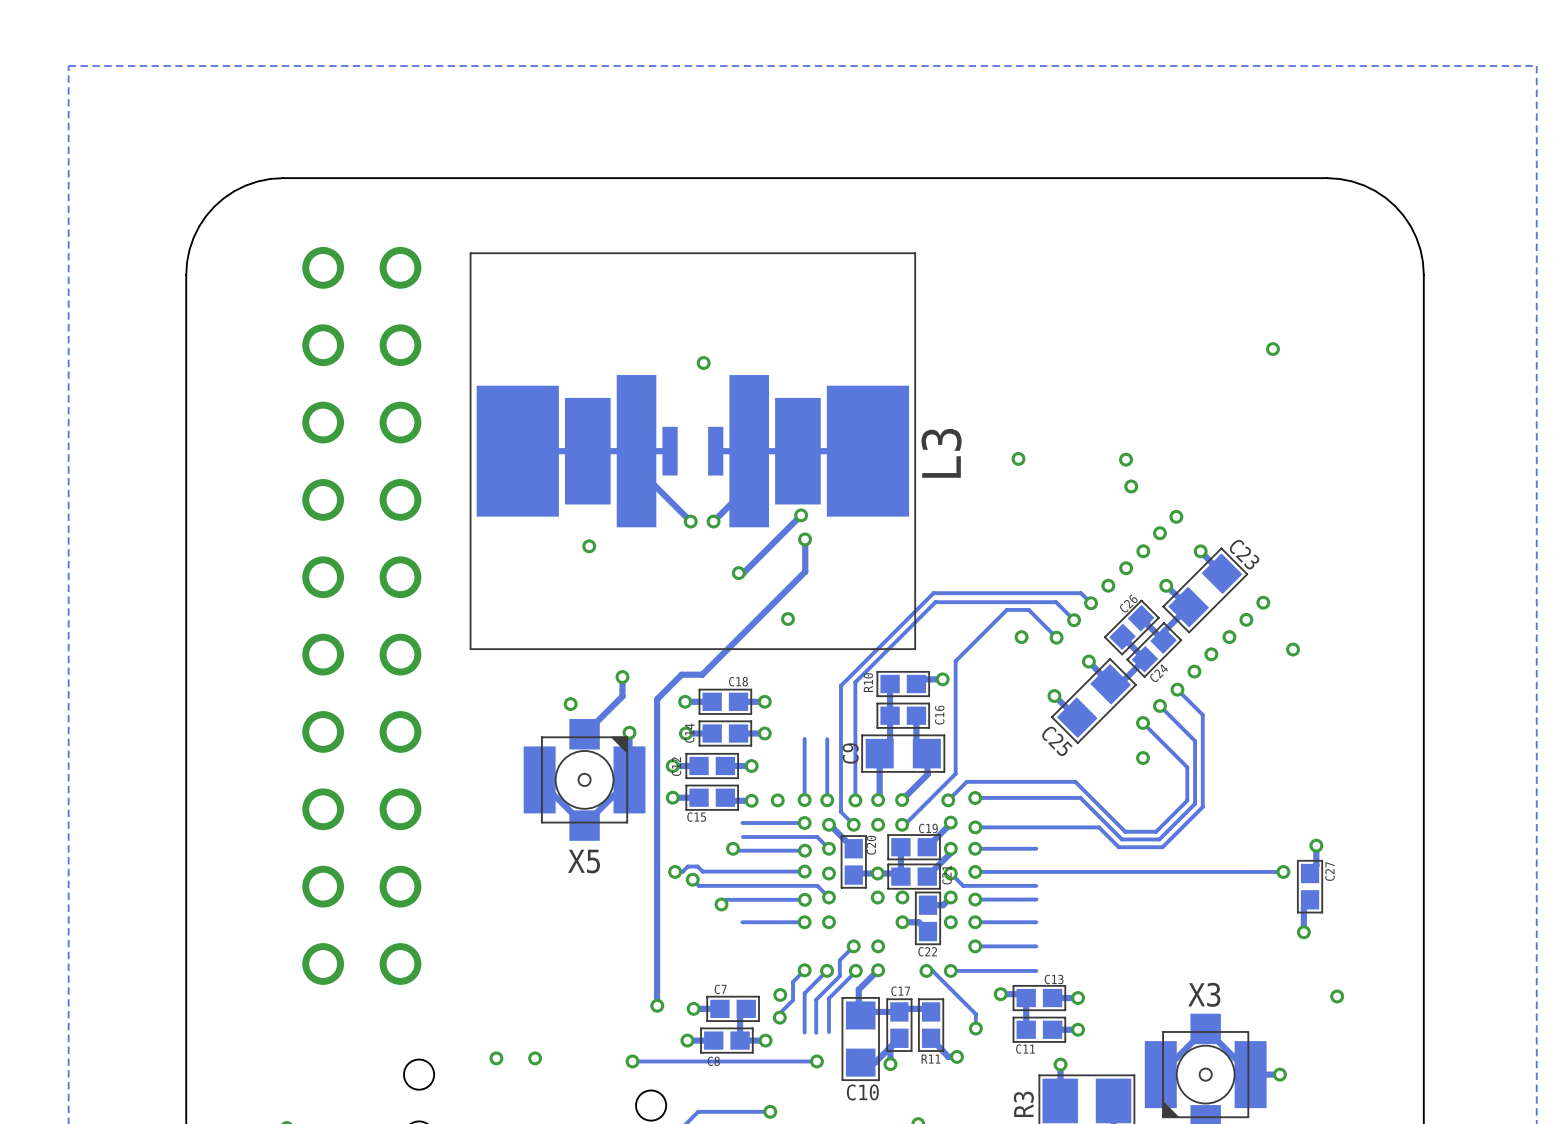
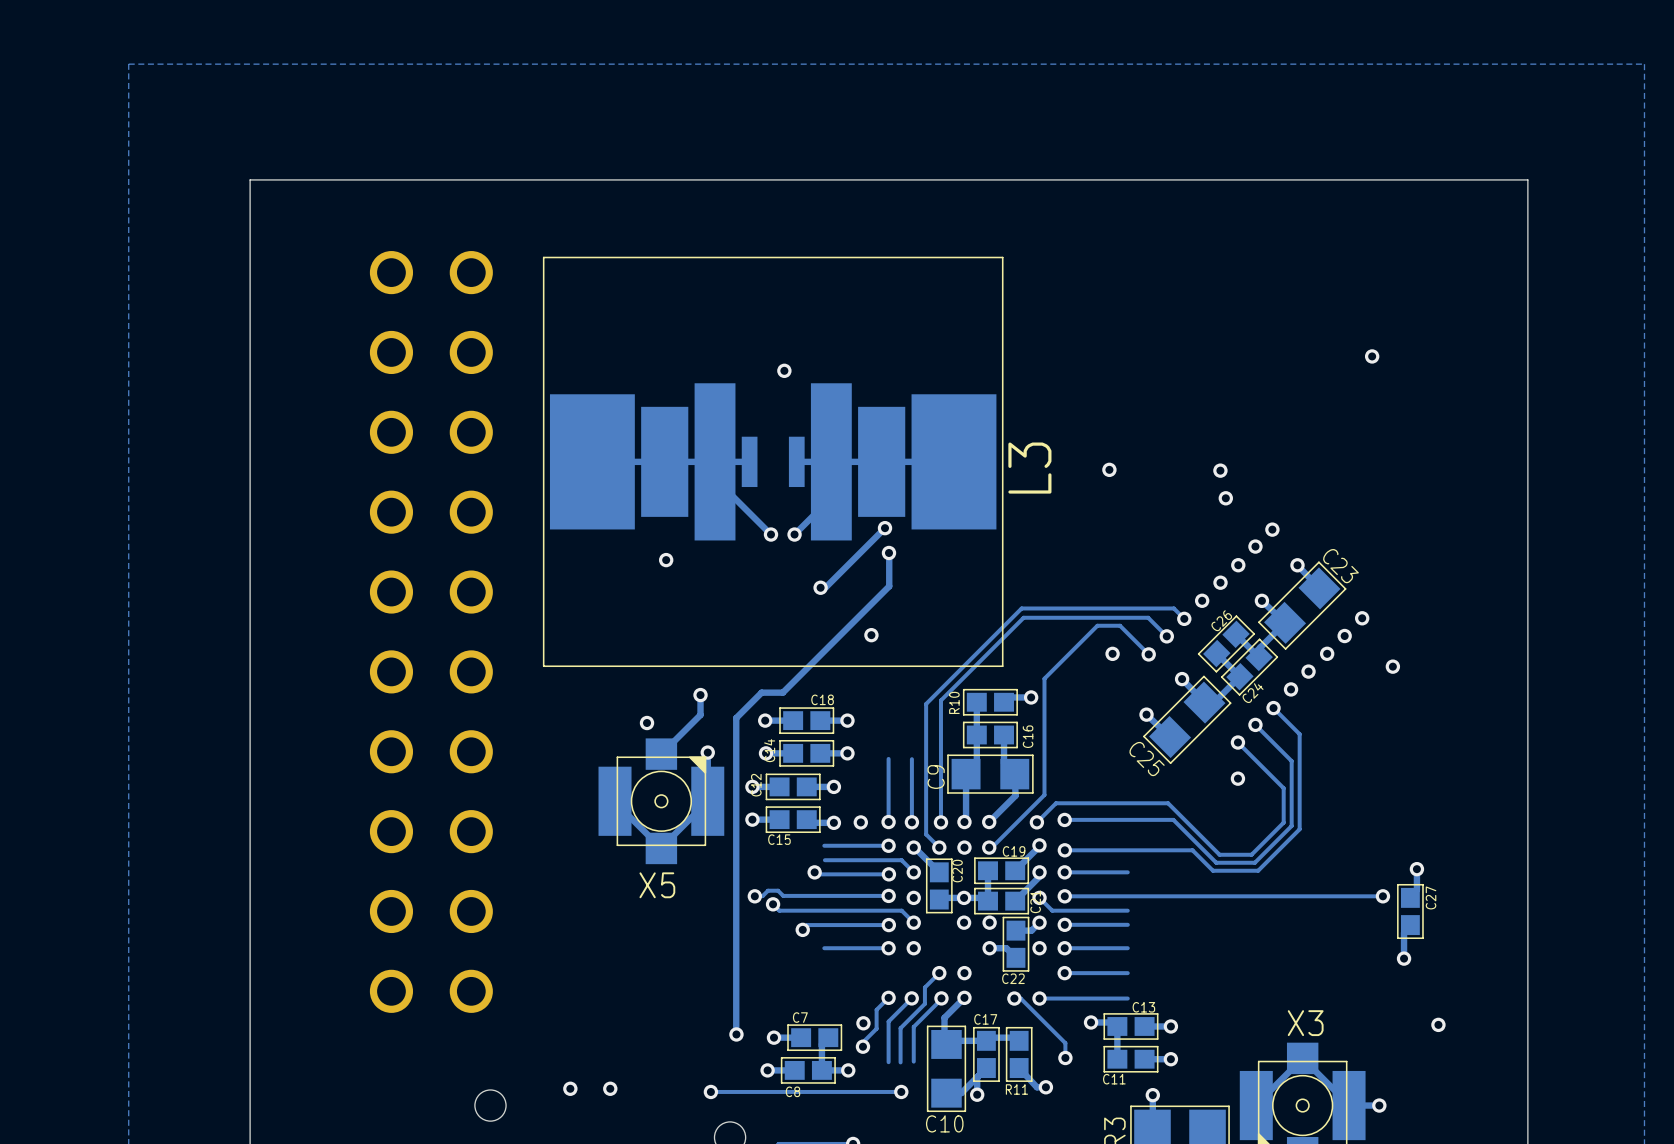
board edge: (282, 178) (257, 181) (245, 185) (234, 191) (214, 206) (199, 226) (193, 237) (189, 249) (186, 274) -> (349, 179) (250, 179) (250, 279)
board edge: (1327, 178) (1352, 181) (1364, 185) (1375, 191) (1395, 206) (1410, 226) (1416, 237) (1420, 249) (1423, 274) -> (1428, 179) (1527, 179) (1527, 279)

